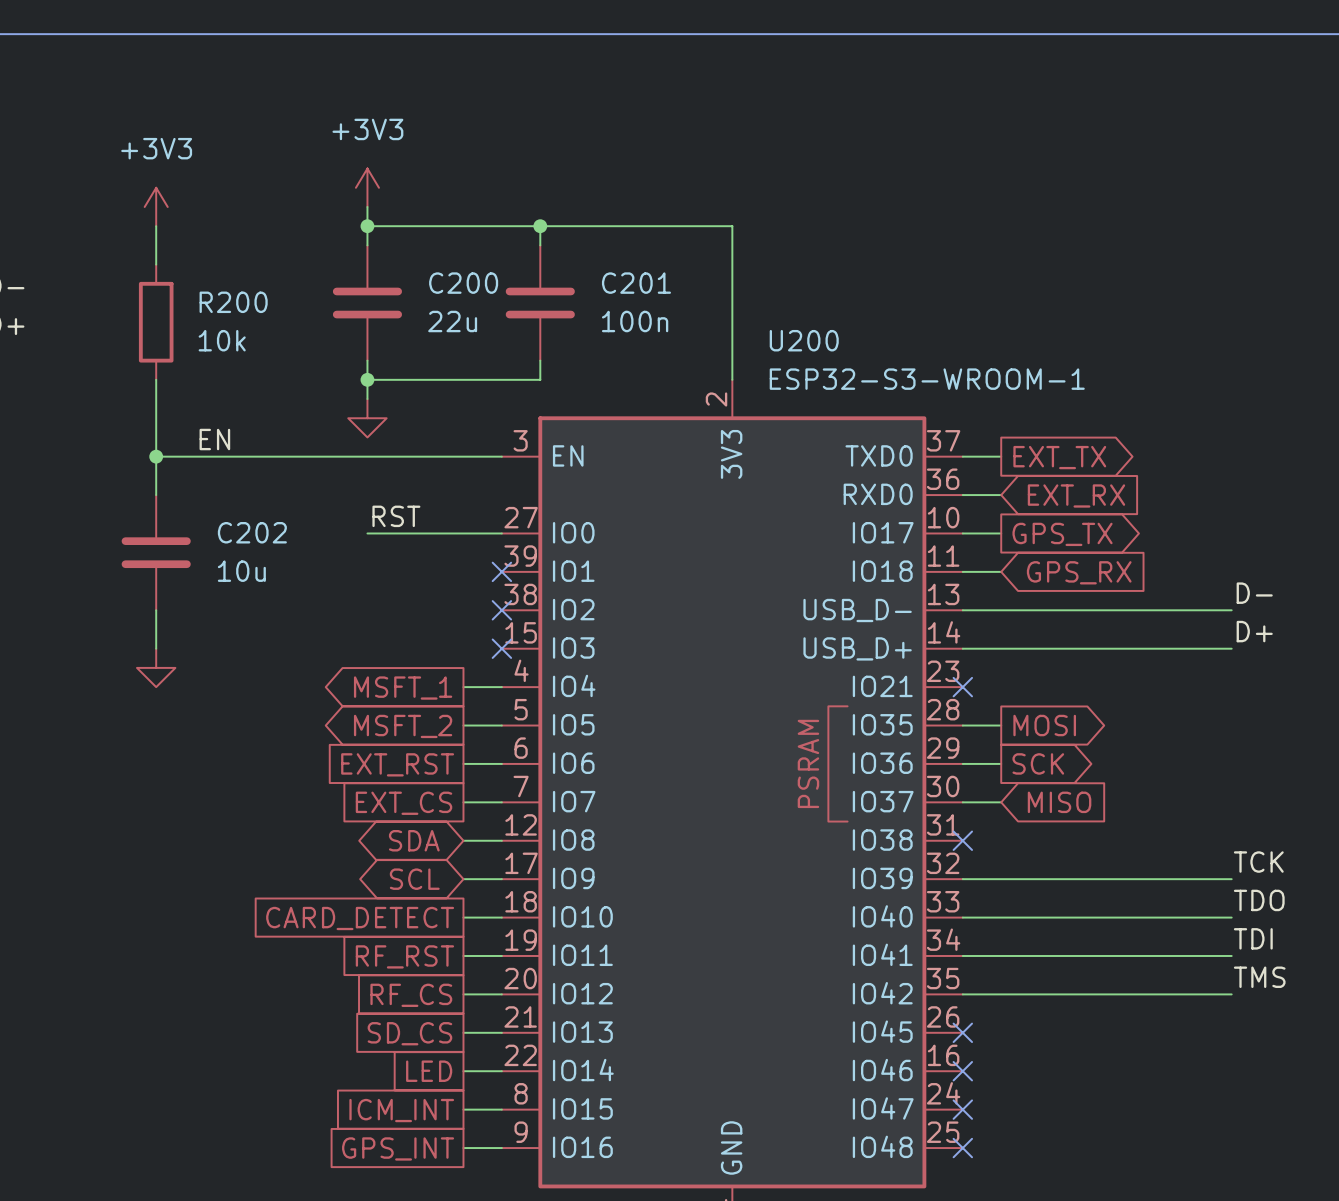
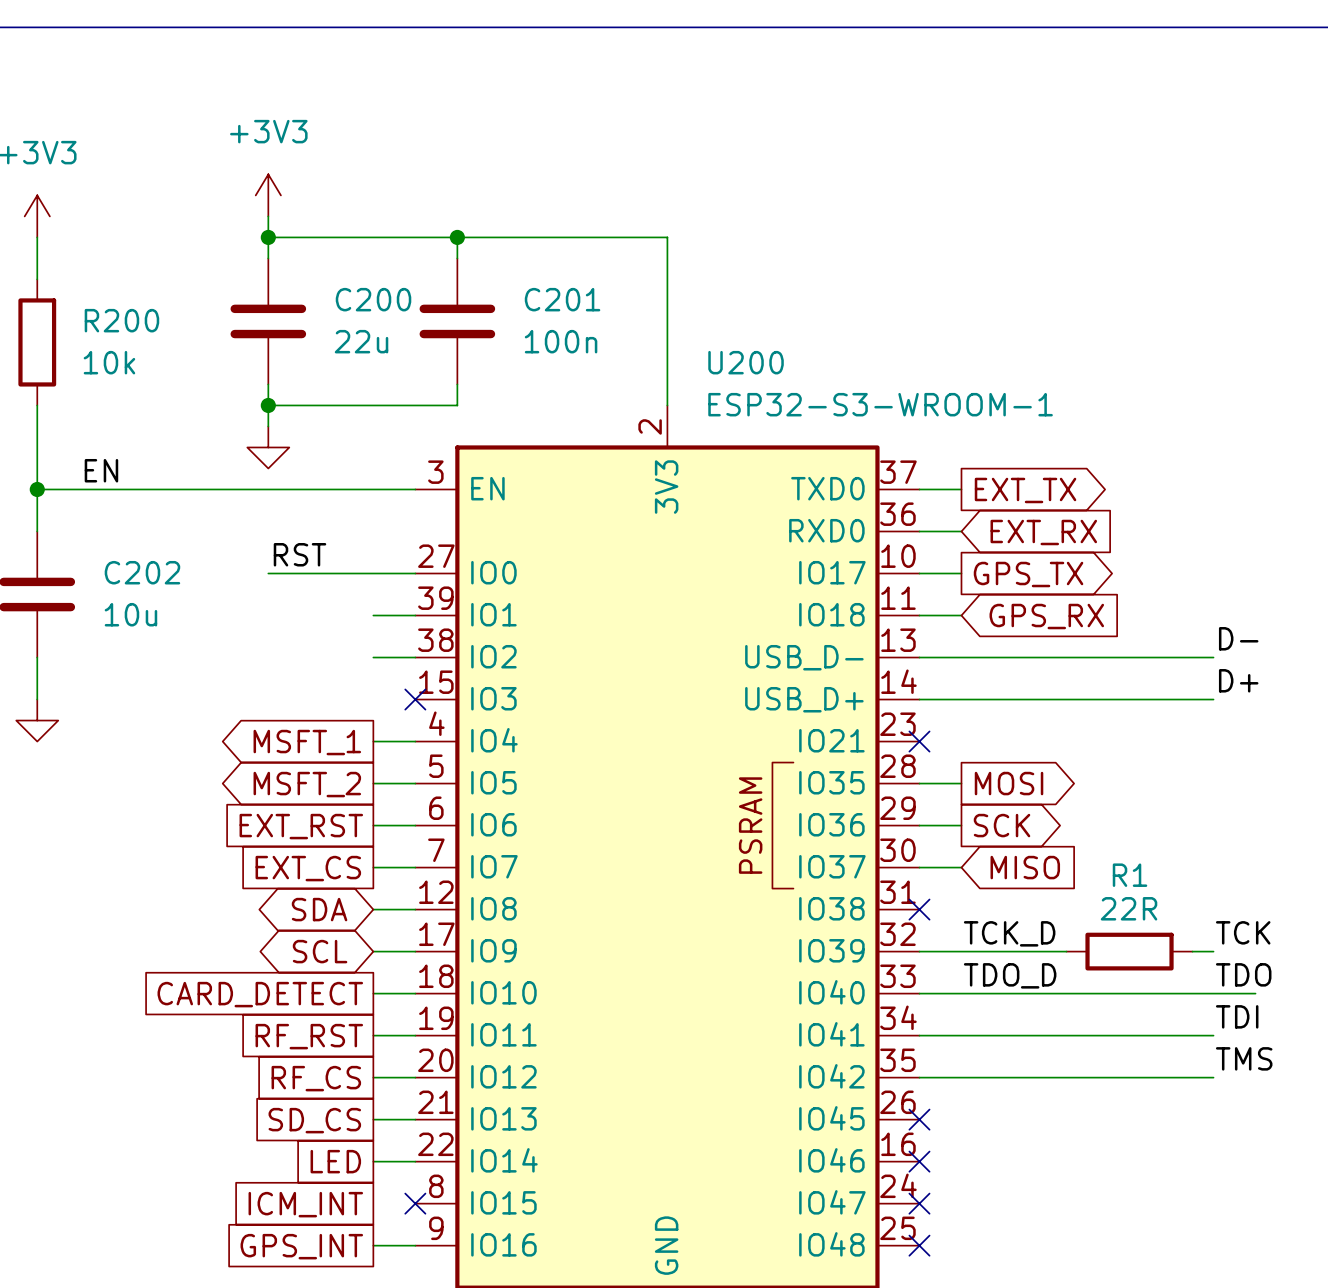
wire: none -> (373, 615) (415, 615)
no-connect mark: (501, 571) -> none
wire: none -> (373, 657) (415, 657)
no-connect mark: (501, 610) -> none
label: none -> TCK_D (1009, 933)
wire: (1097, 879) (1212, 879) -> none
R1: none -> 22R (1129, 951)
label: none -> TDO_D (1010, 975)
wire: none -> (1213, 993) (1255, 993)
wire: (463, 1109) (501, 1109) -> none
no-connect mark: none -> (415, 1203)

